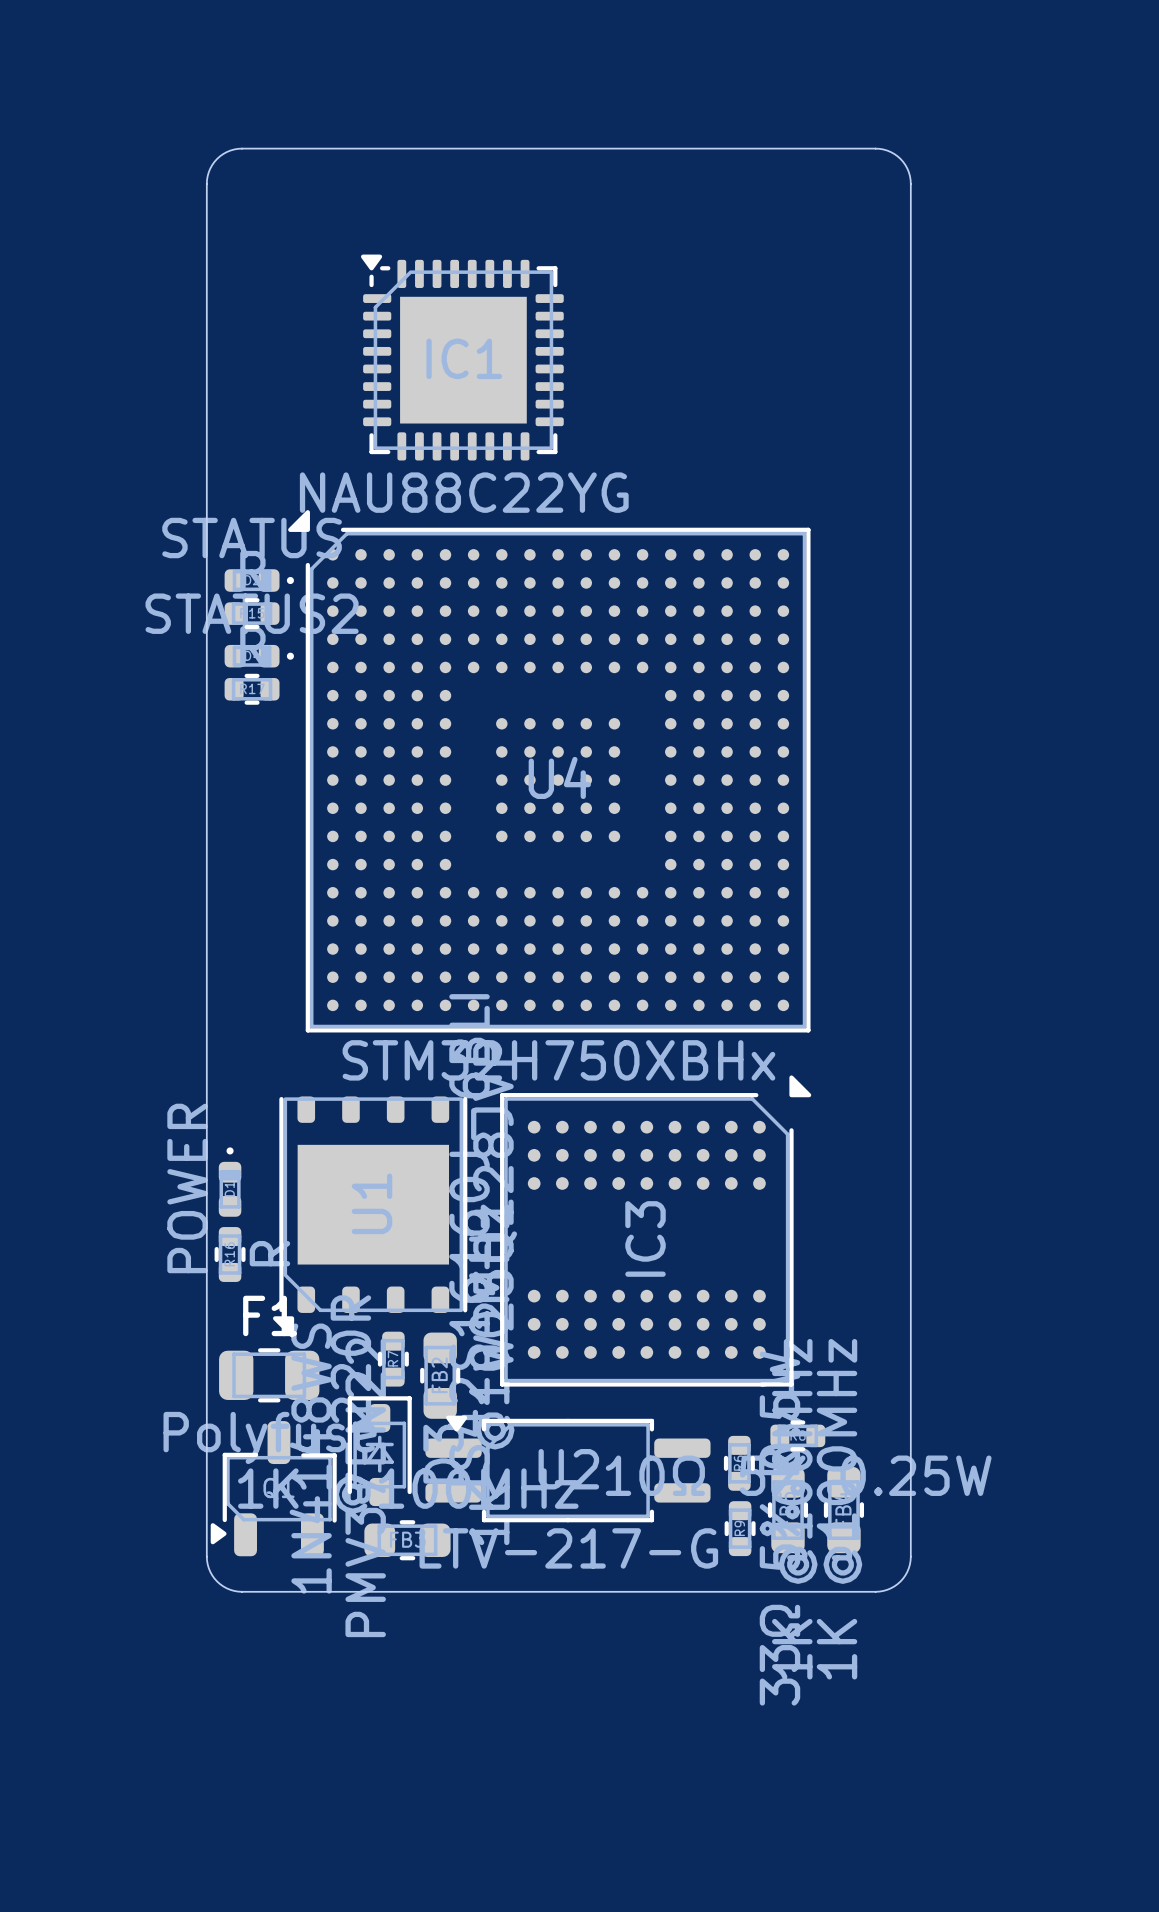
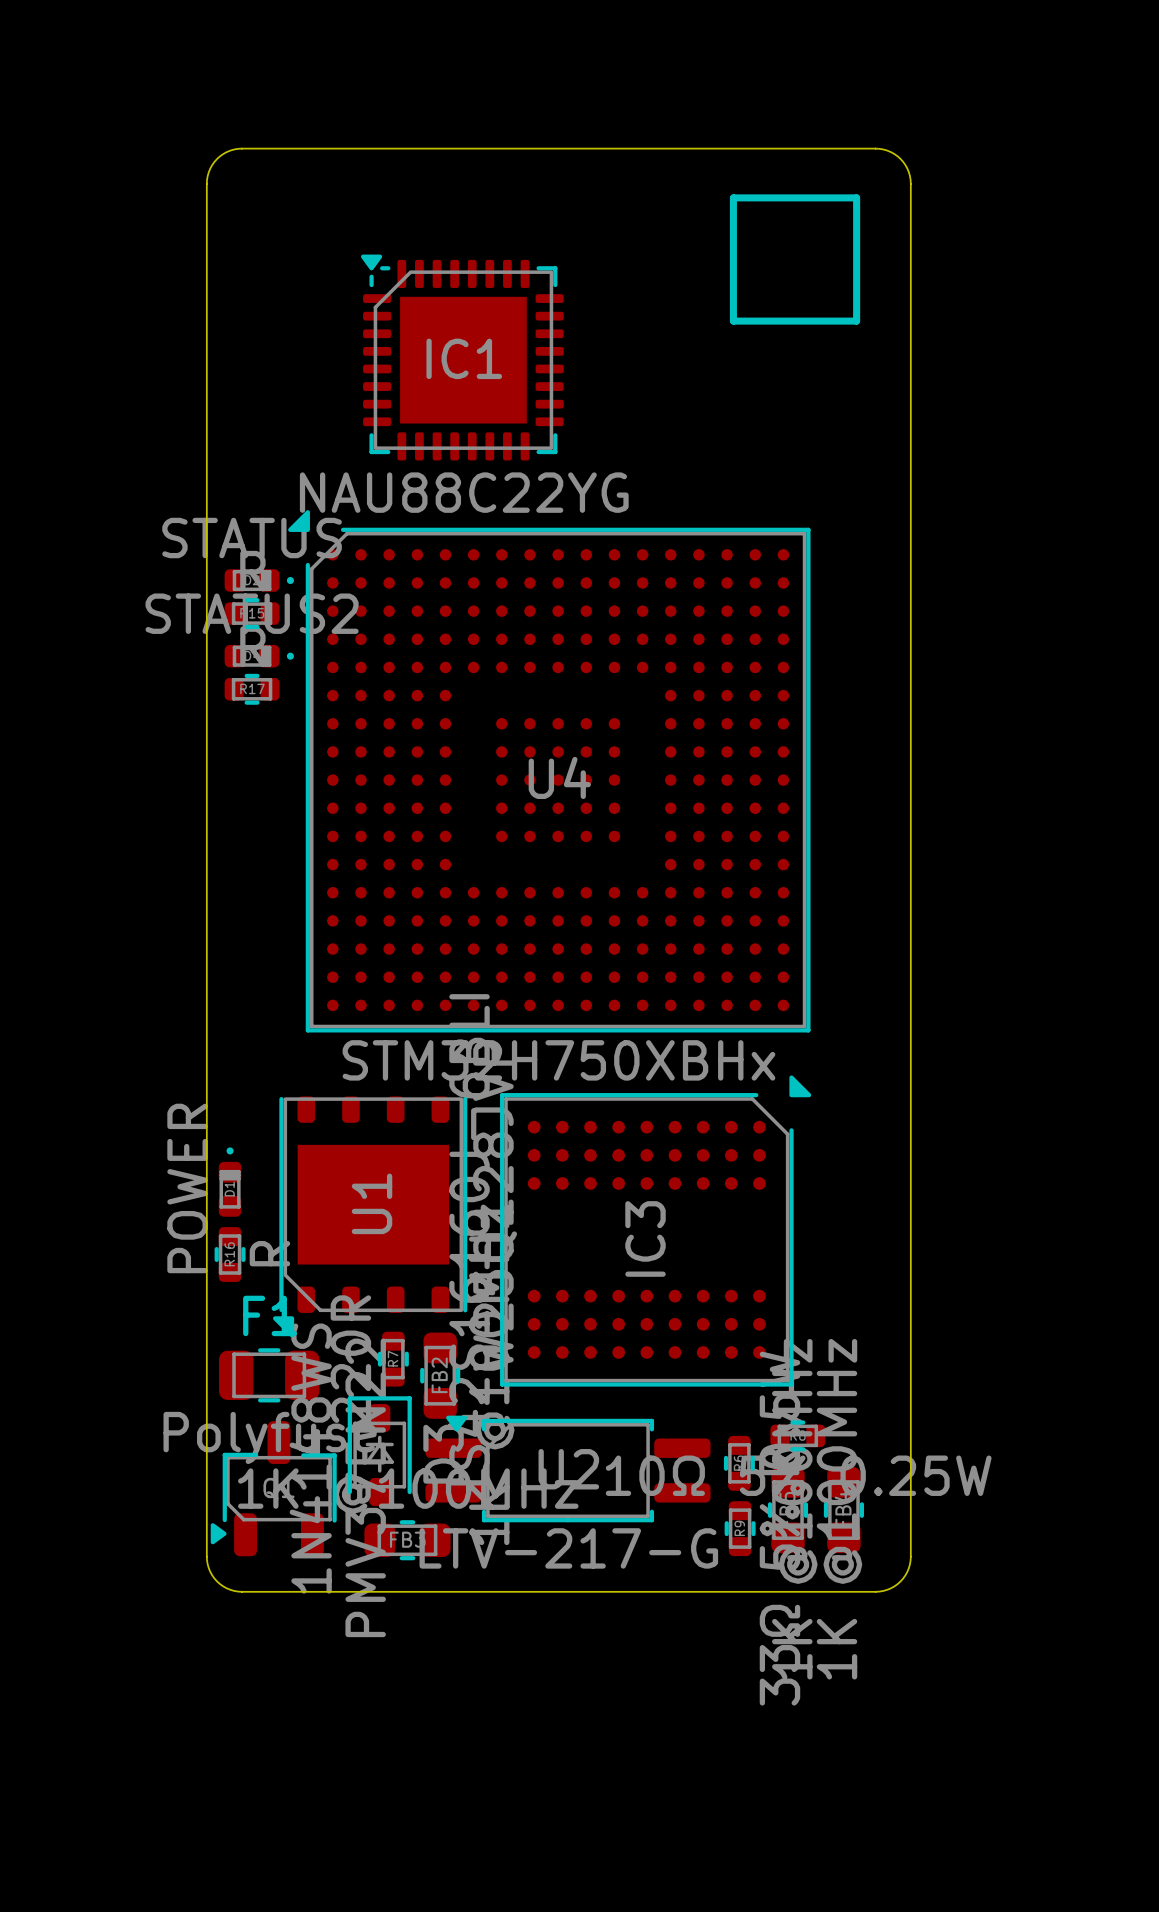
line: none -> (733, 197) (856, 197) (856, 321) (733, 321) (733, 197)

